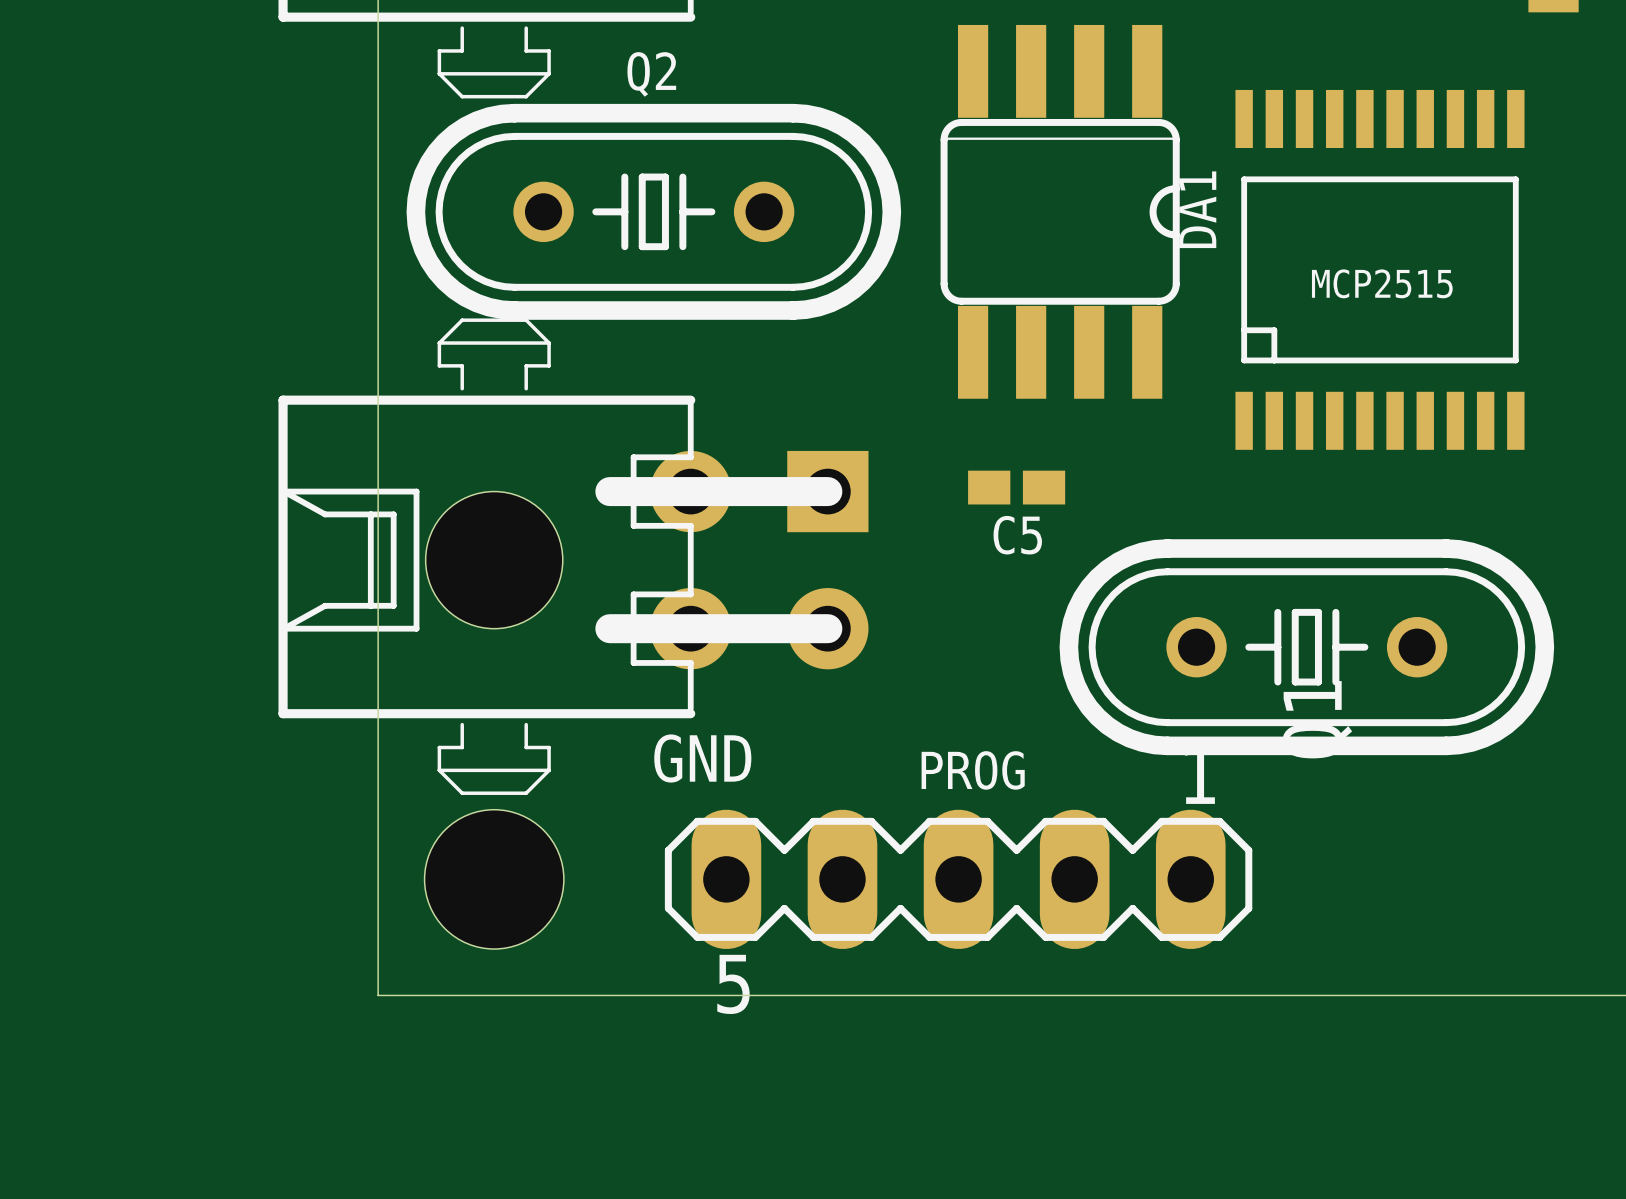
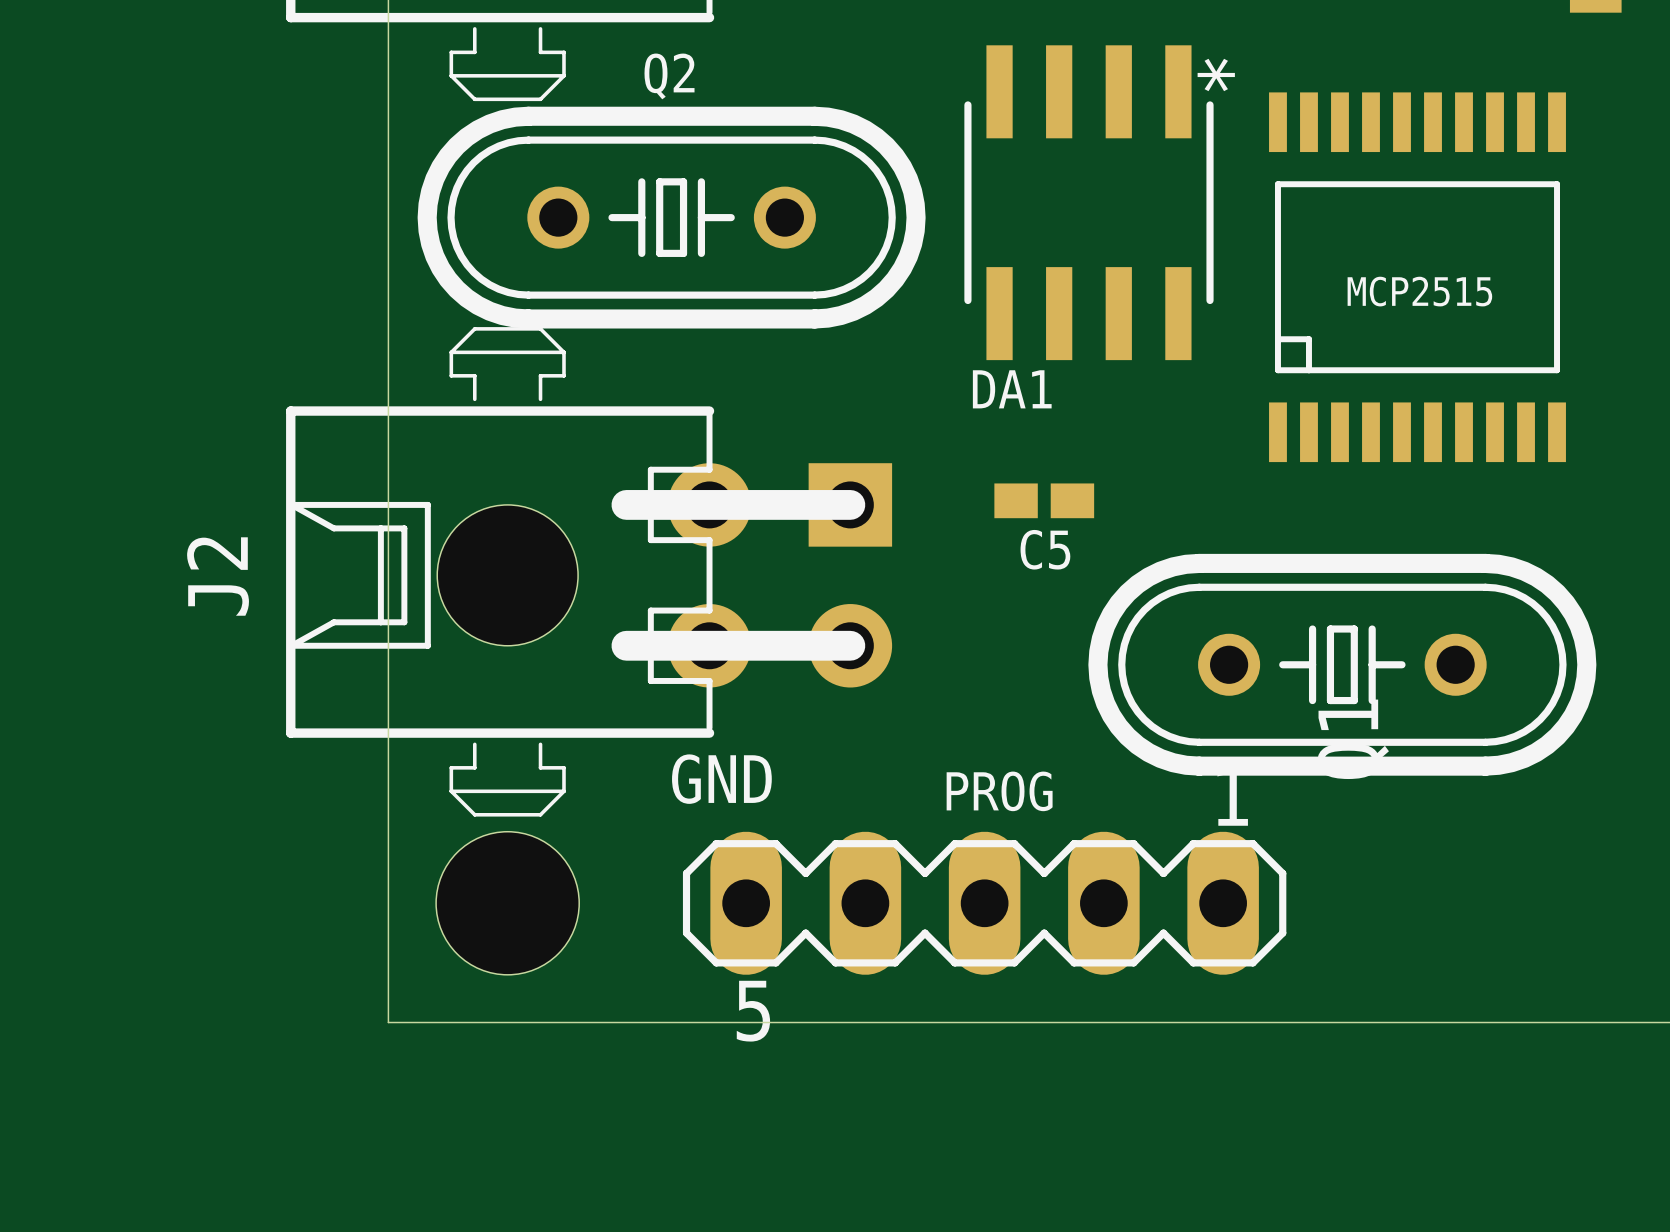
DA1 footprint: [940, 24, 1180, 399] -> [964, 45, 1214, 361]
DA1 name position: DA1 (1197, 209) -> DA1 (1012, 389)
J2 name: none -> J2 (218, 576)

